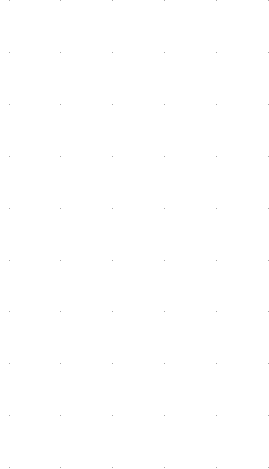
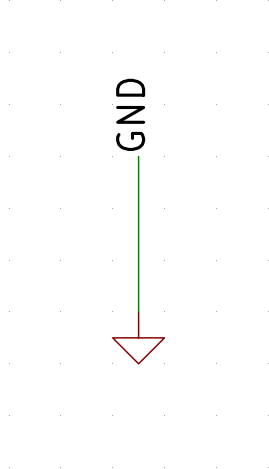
label: none -> GND (130, 114)
wire: none -> (138, 156) (138, 311)
power symbol: none -> (138, 337)

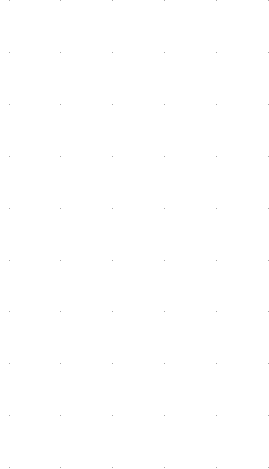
label: GND (130, 114) -> none
wire: (138, 156) (138, 311) -> none
power symbol: (138, 337) -> none

